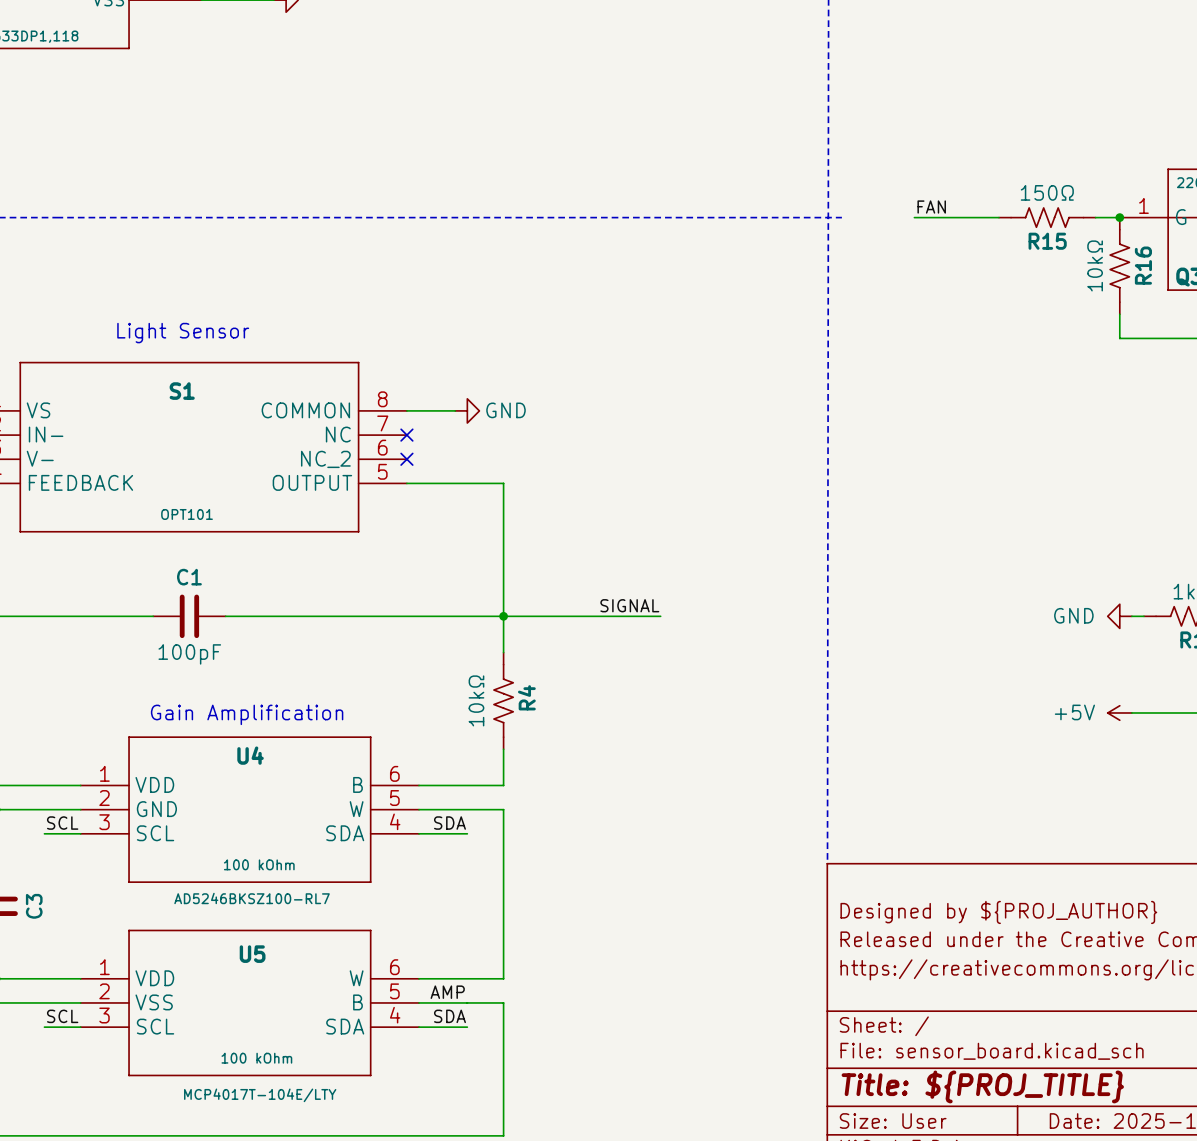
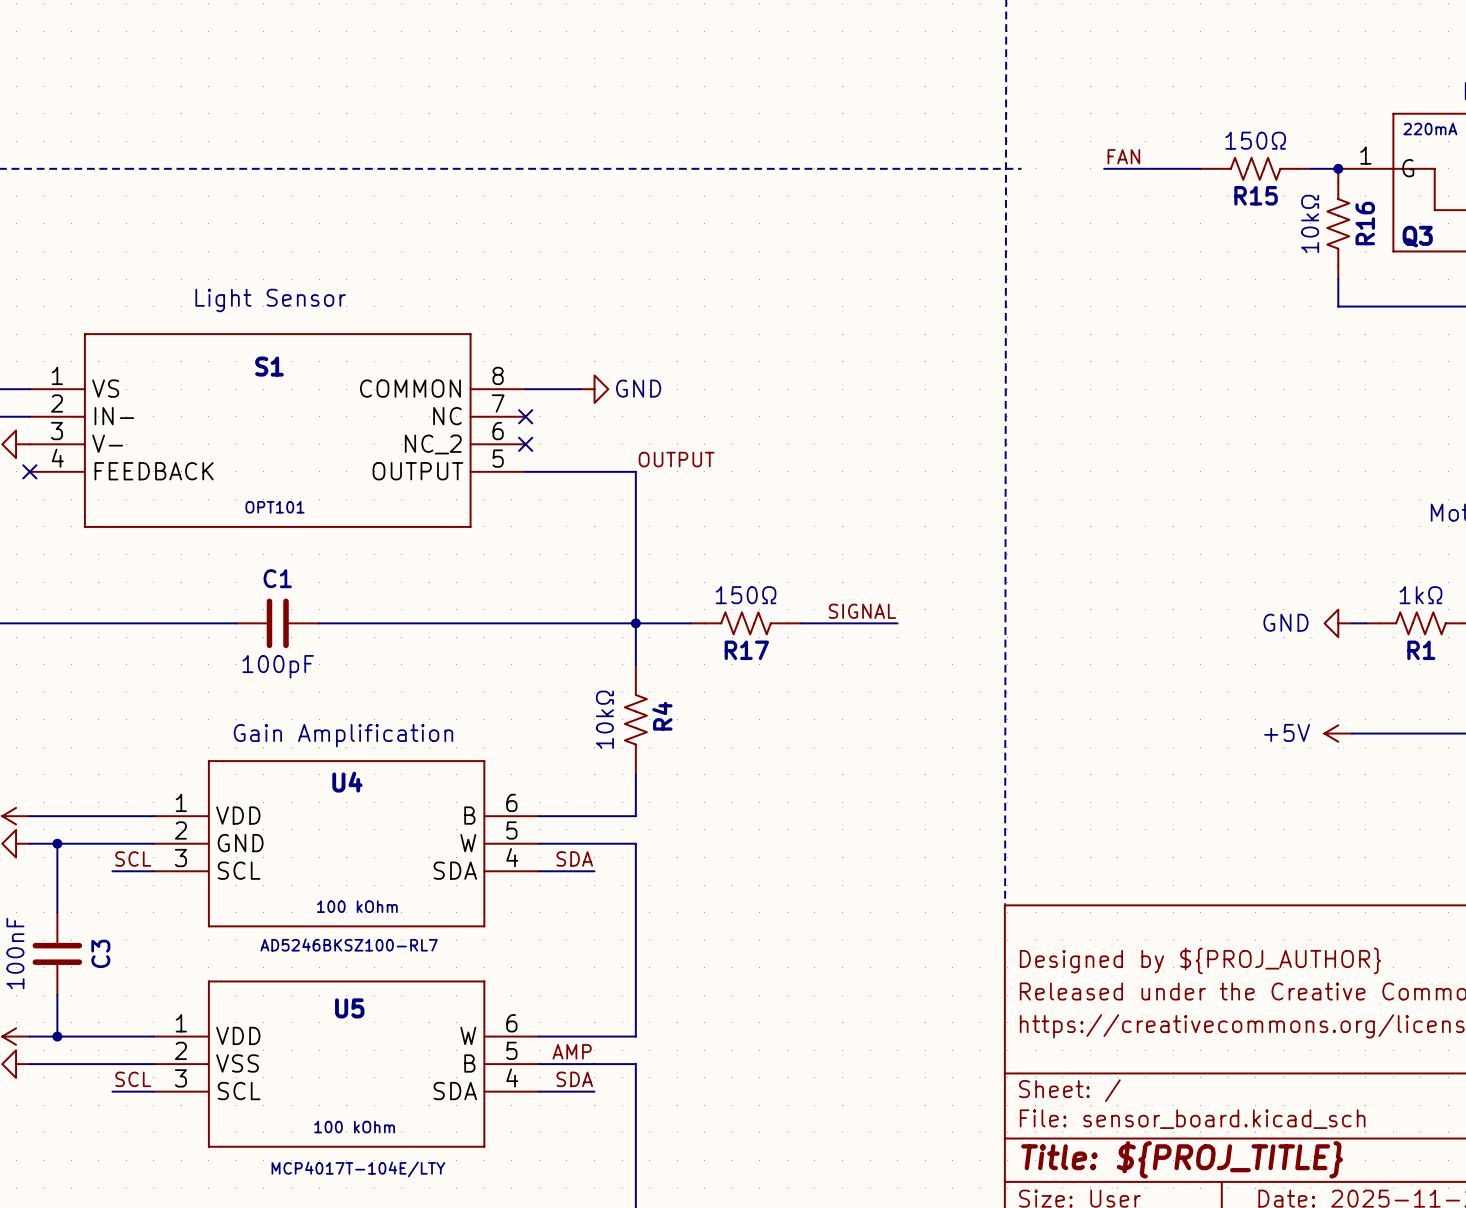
label: none -> OUTPUT (676, 459)
label position: SIGNAL (629, 605) -> SIGNAL (862, 611)
R17: none -> 150Ω (746, 623)
wire: none -> (814, 623) (897, 623)

